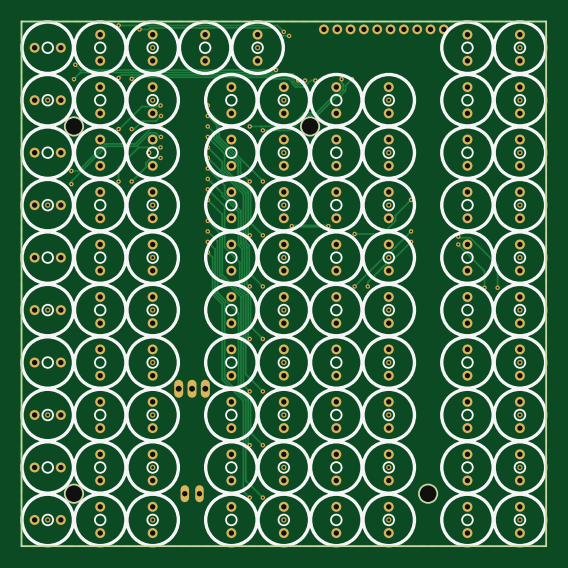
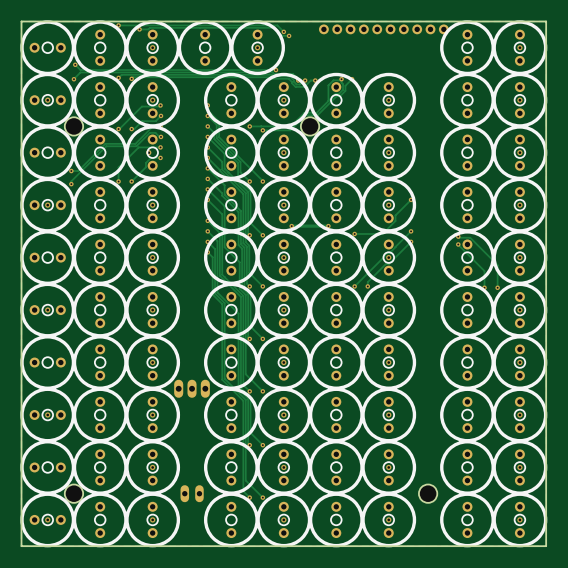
track: none -> (341, 79) (333, 80) (328, 85) (328, 101)

